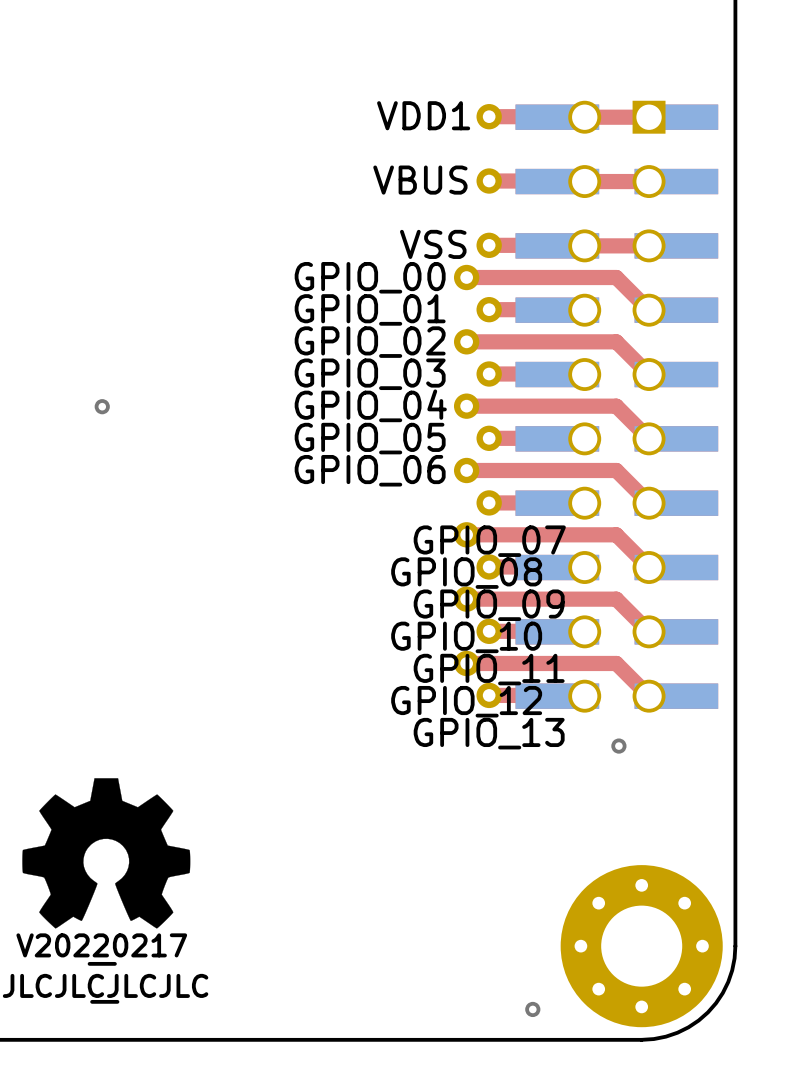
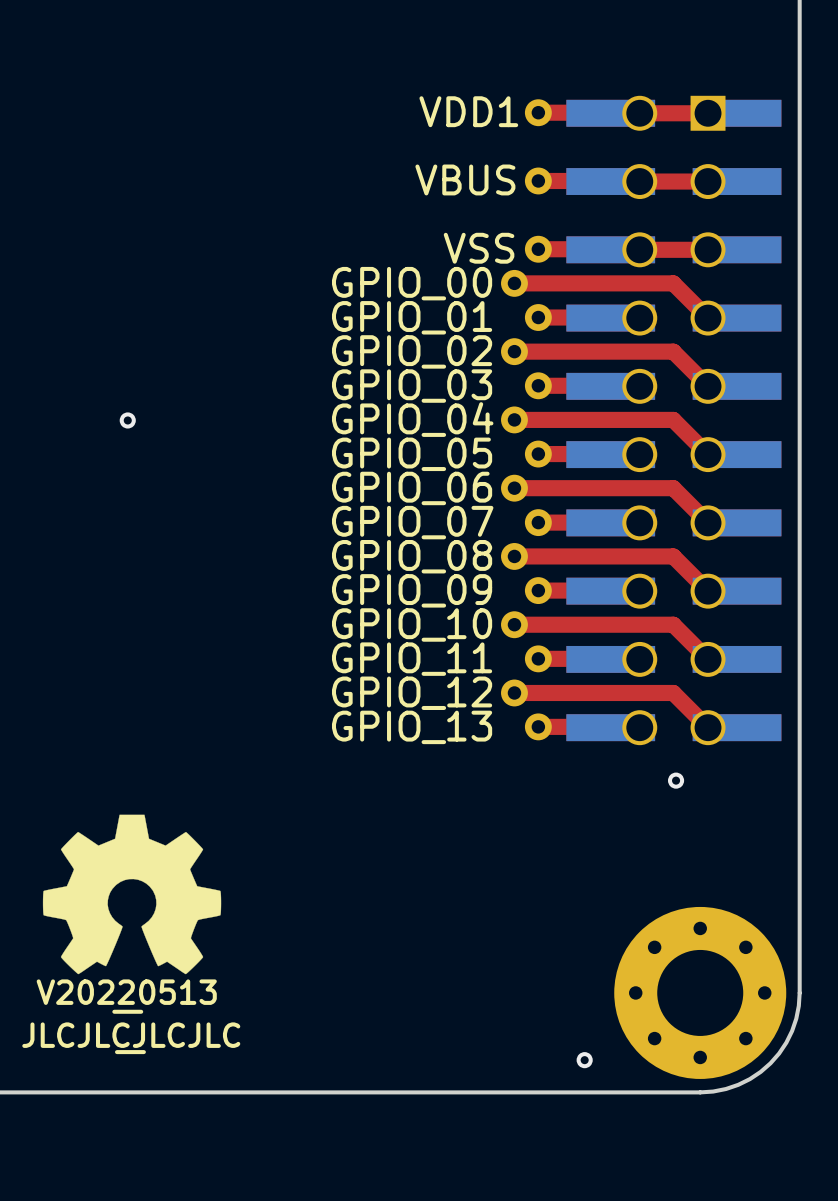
part value position: GPIO_07 (489, 541) -> GPIO_07 (412, 522)
part value position: GPIO_08 (466, 573) -> GPIO_08 (412, 556)
part value position: GPIO_09 (489, 605) -> GPIO_09 (412, 590)
part value position: GPIO_10 (466, 637) -> GPIO_10 (412, 624)
part value position: GPIO_11 (489, 669) -> GPIO_11 (412, 659)
part value position: GPIO_12 (466, 701) -> GPIO_12 (412, 693)
part value position: GPIO_13 (489, 733) -> GPIO_13 (412, 727)
drawing shape: [16, 933, 188, 966] -> [36, 979, 217, 1014]

